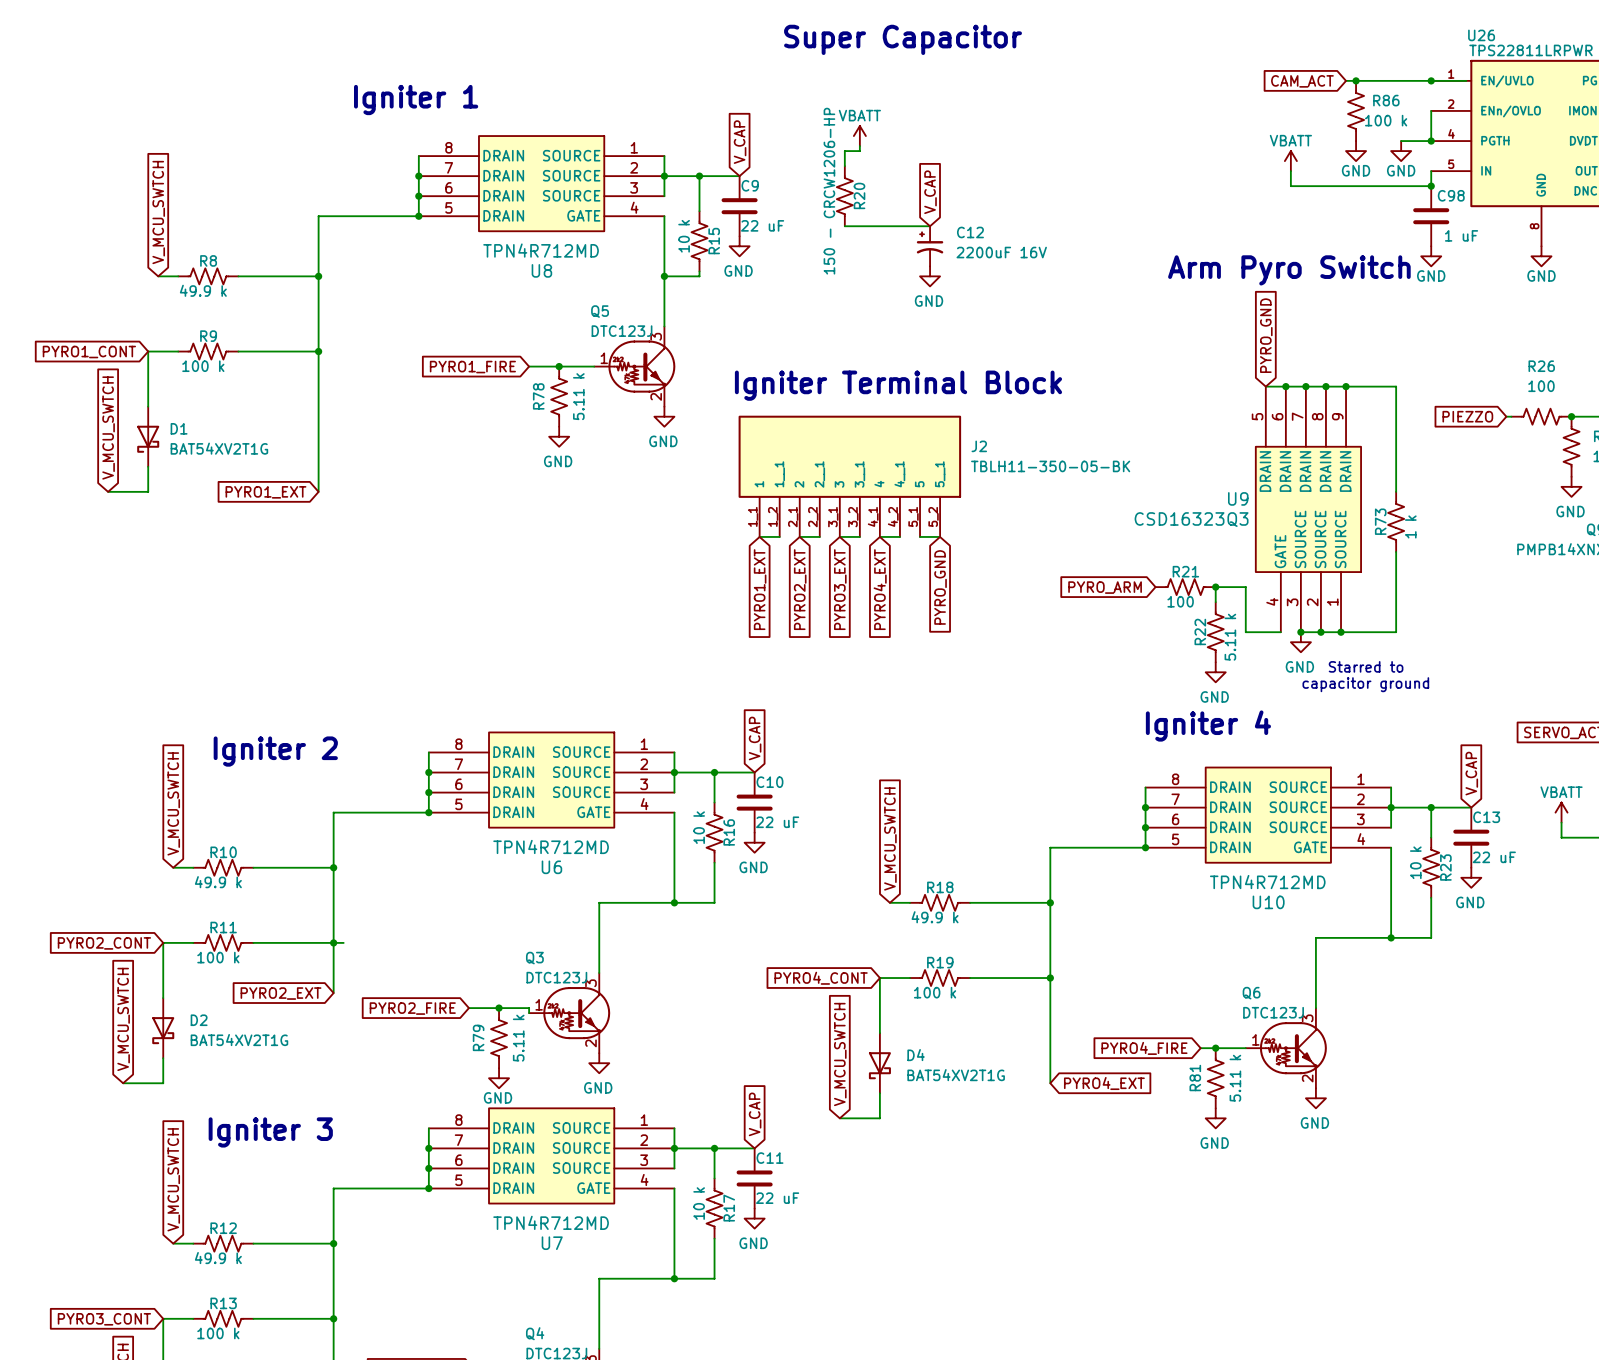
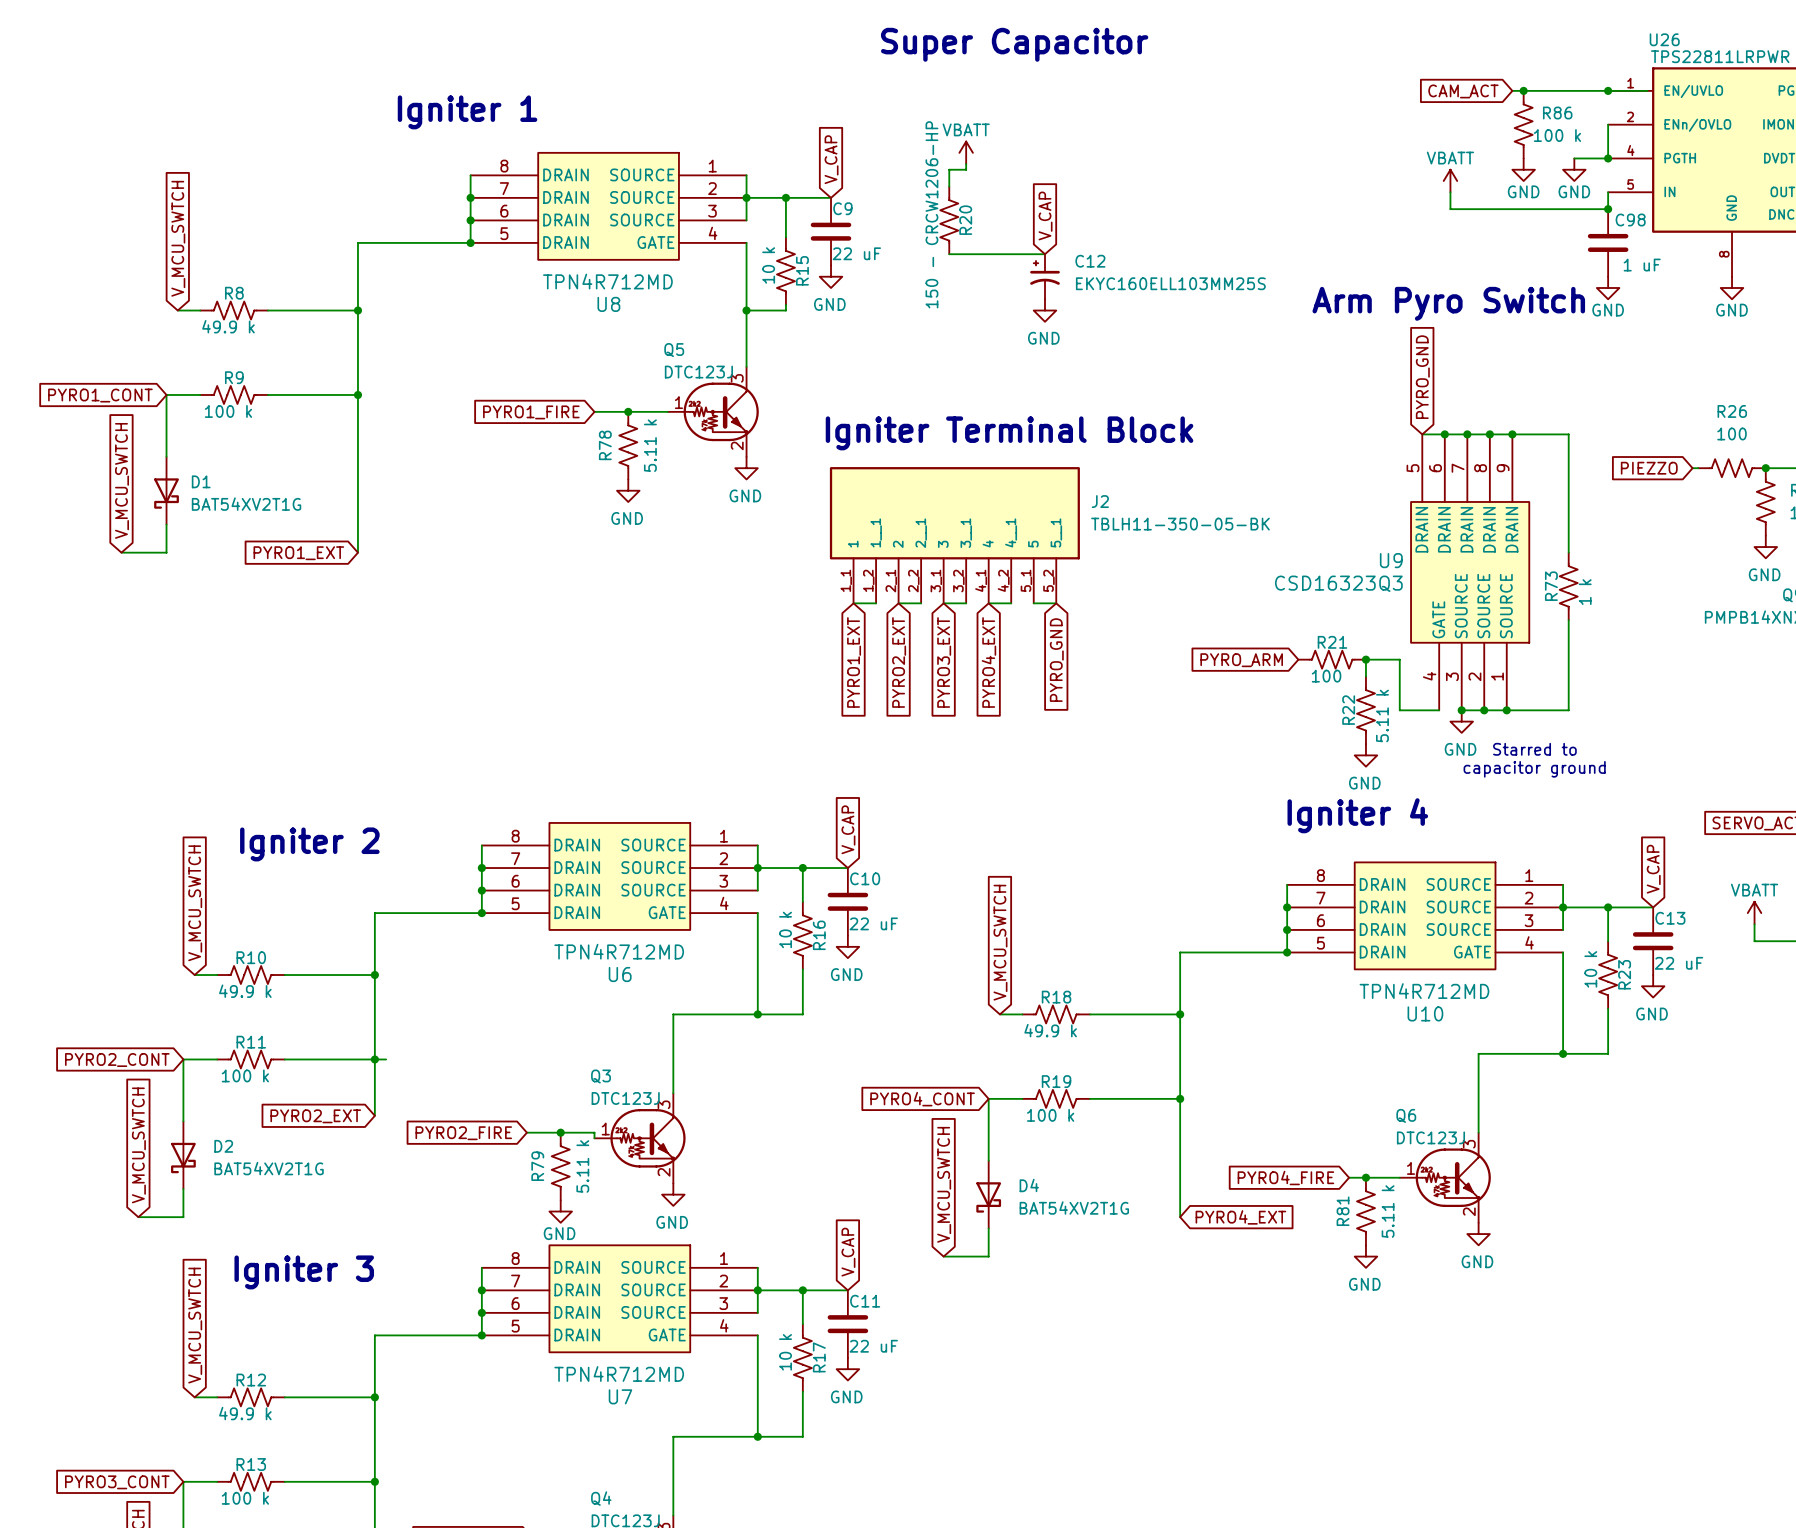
C12 value: 2200uF 16V (1001, 252) -> EKYC160ELL103MM25S (1170, 283)

